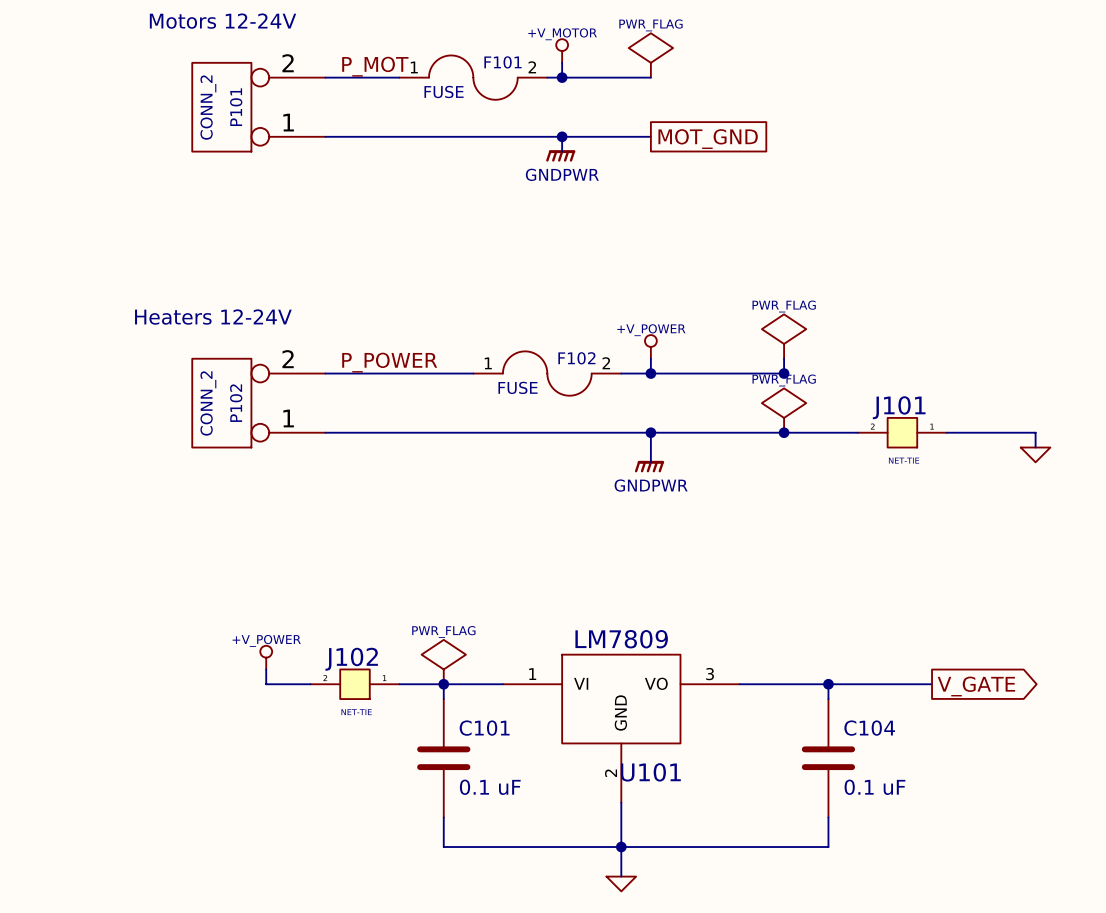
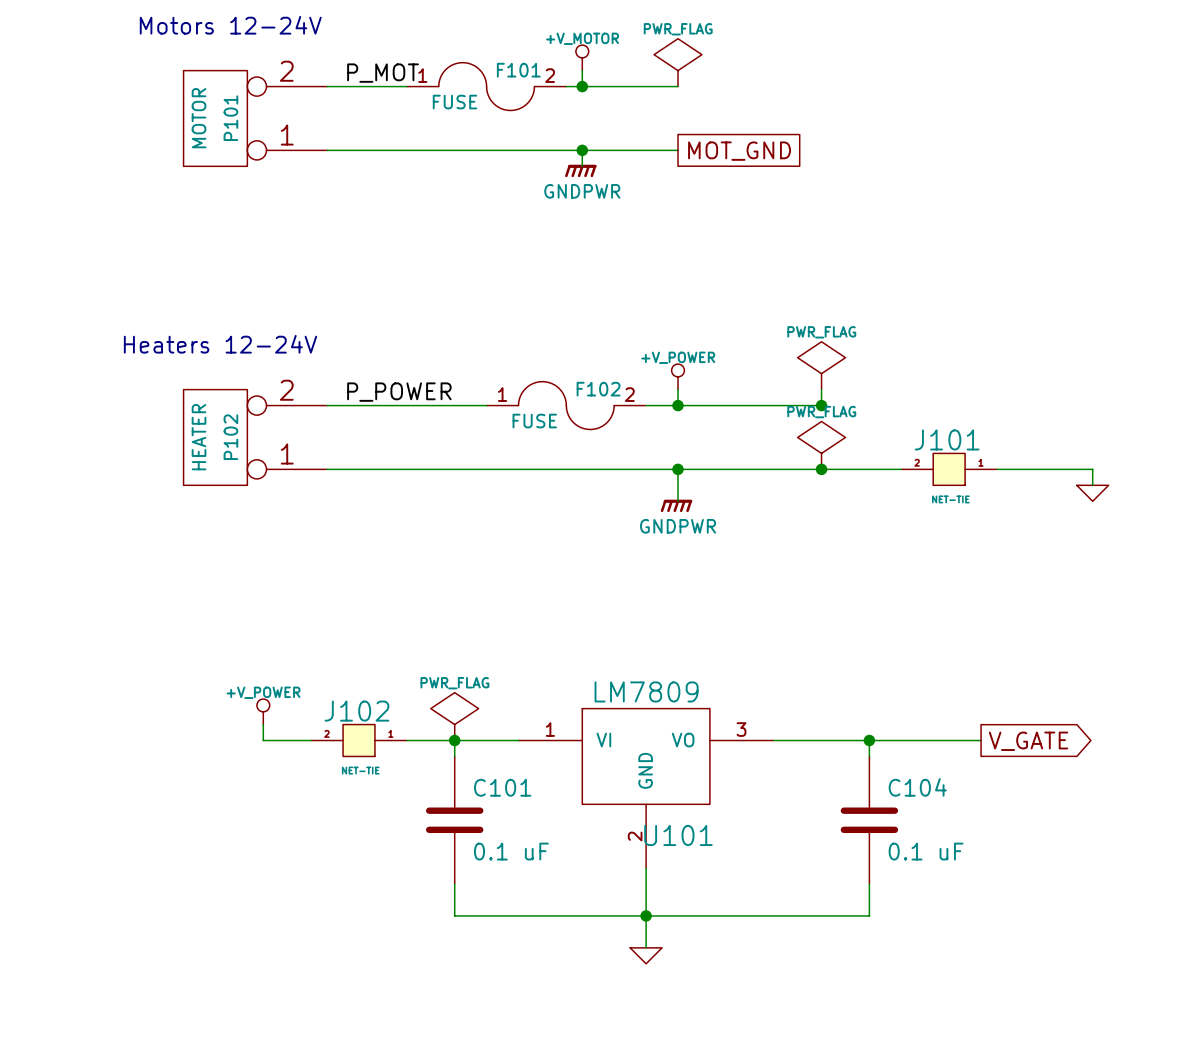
P101 value: CONN_2 (208, 107) -> MOTOR (199, 118)
P102 value: CONN_2 (208, 403) -> HEATER (199, 437)

